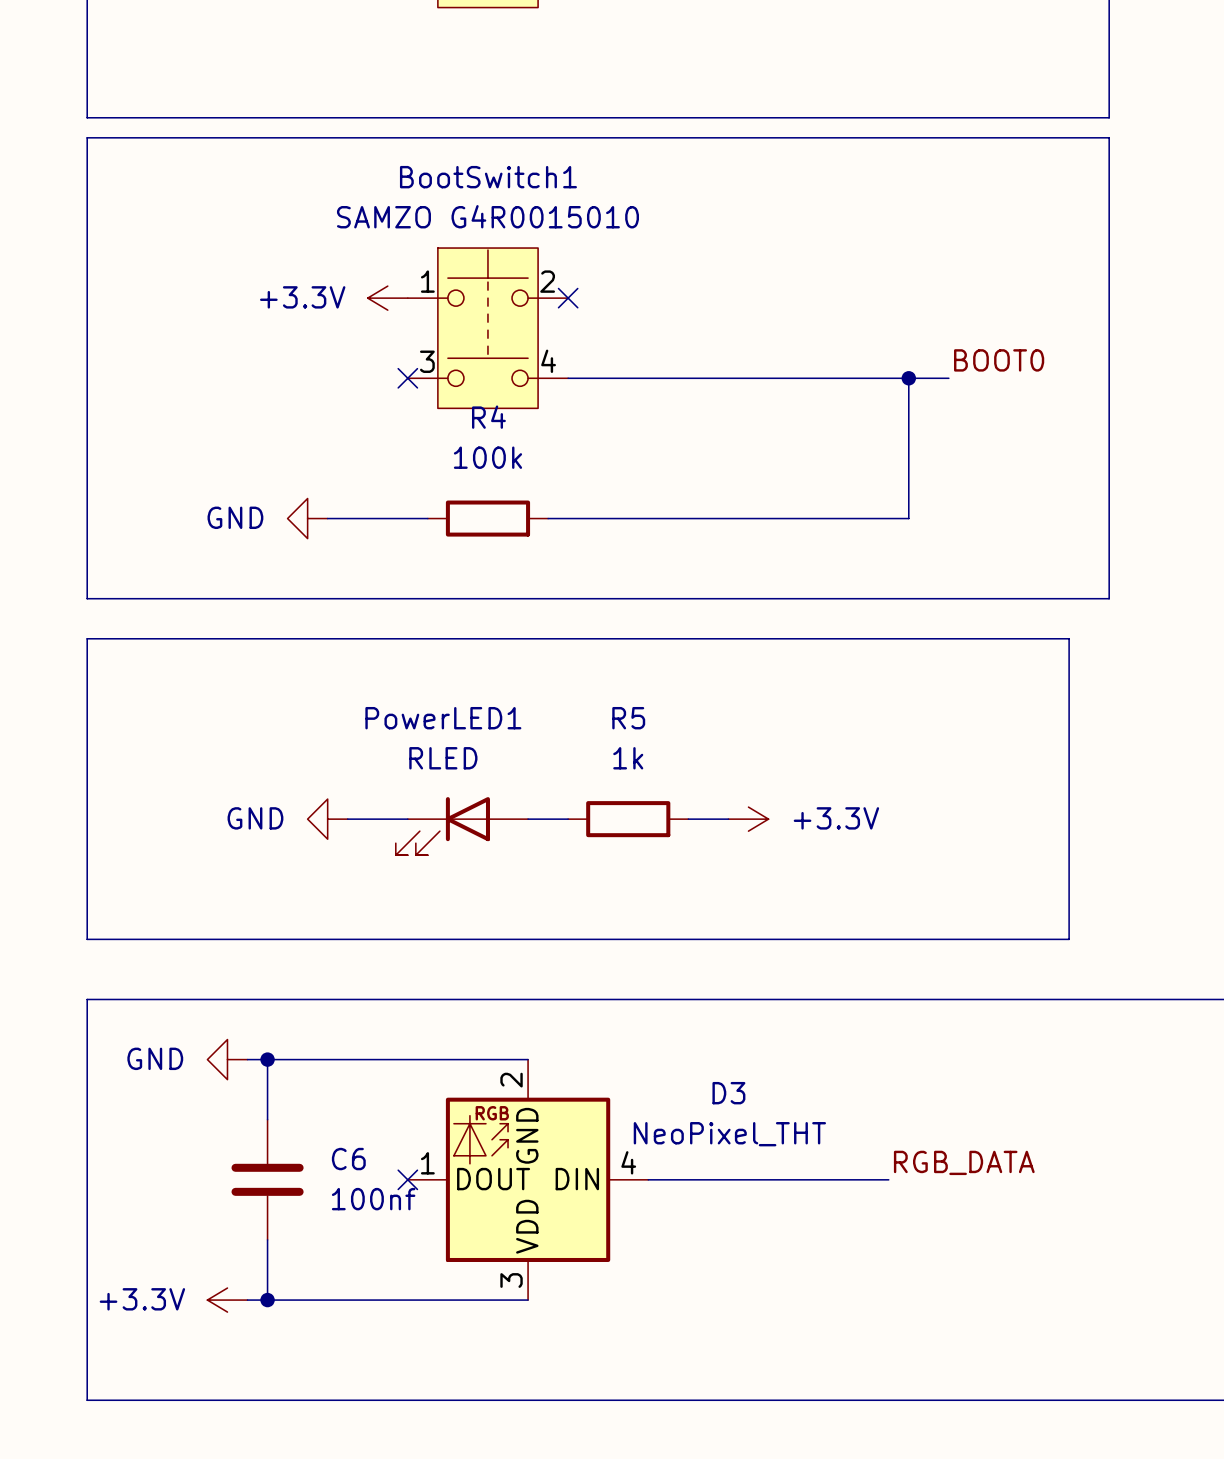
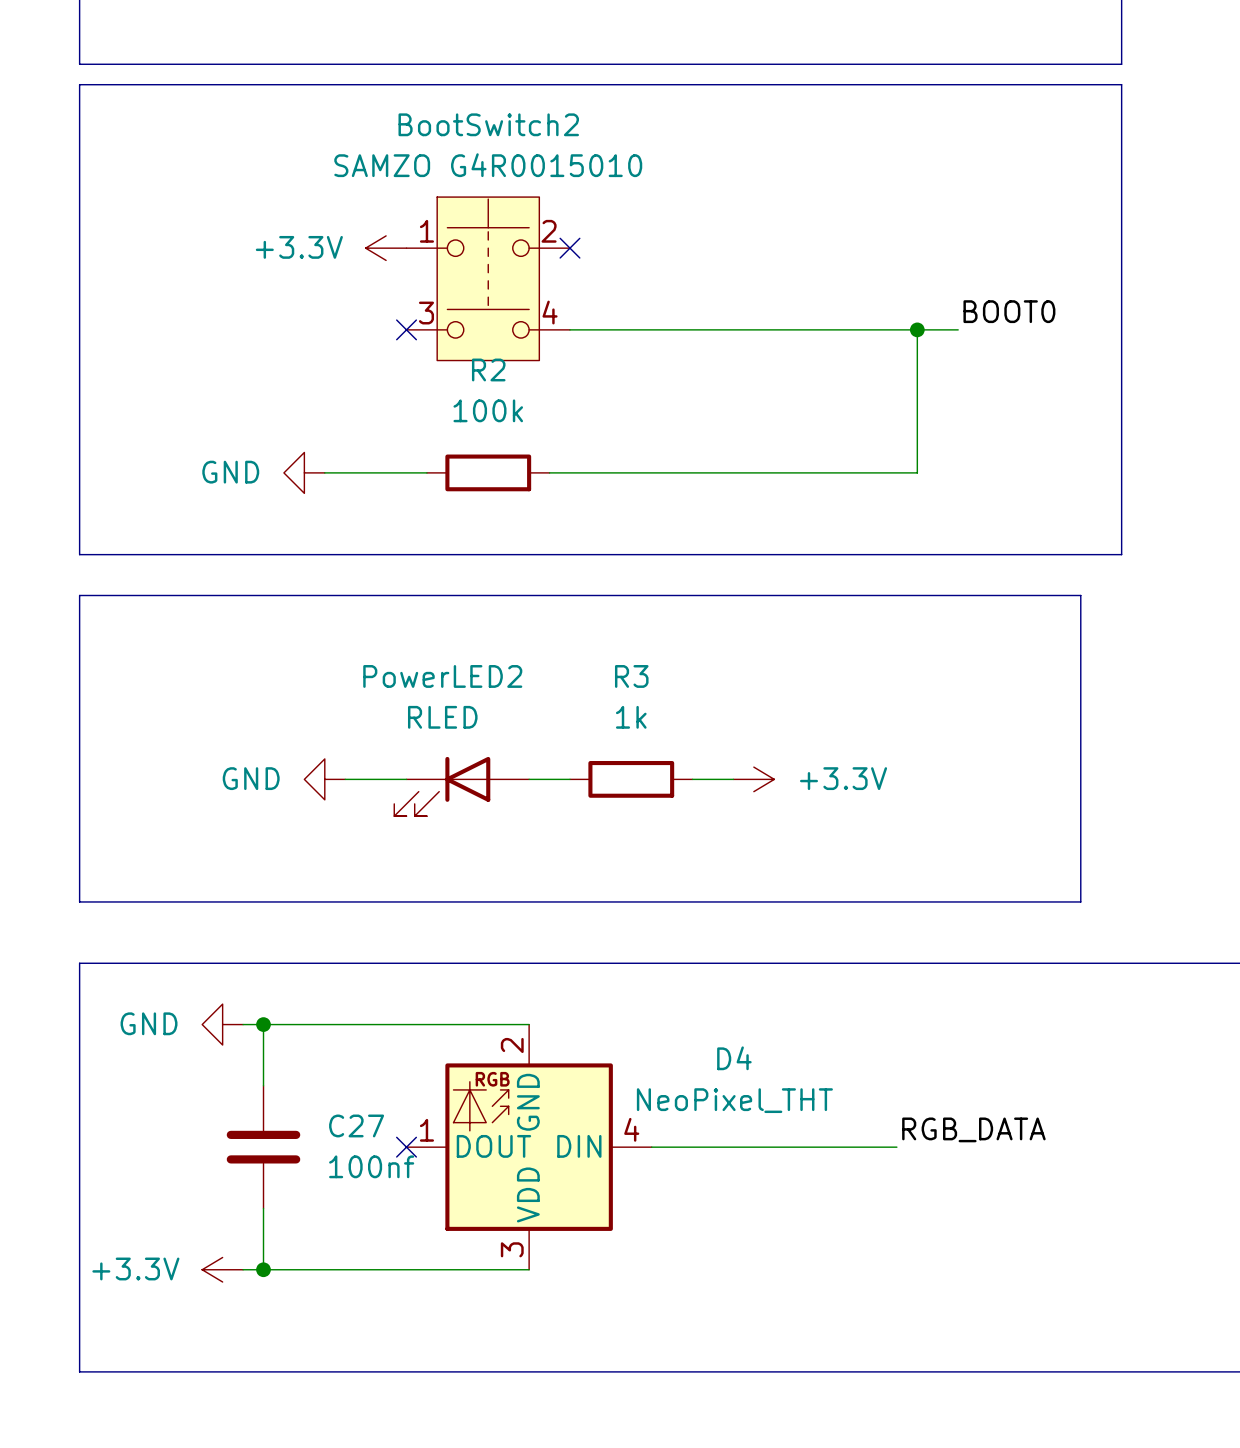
BootSwitch1 name: BootSwitch1 (488, 177) -> BootSwitch2 (488, 124)
R4 name: R4 (488, 417) -> R2 (488, 369)
PowerLED1 name: PowerLED1 (443, 718) -> PowerLED2 (442, 676)
R5 name: R5 (628, 718) -> R3 (631, 676)
D3 name: D3 (728, 1093) -> D4 (734, 1058)
C6 name: C6 (348, 1159) -> C27 (356, 1125)

